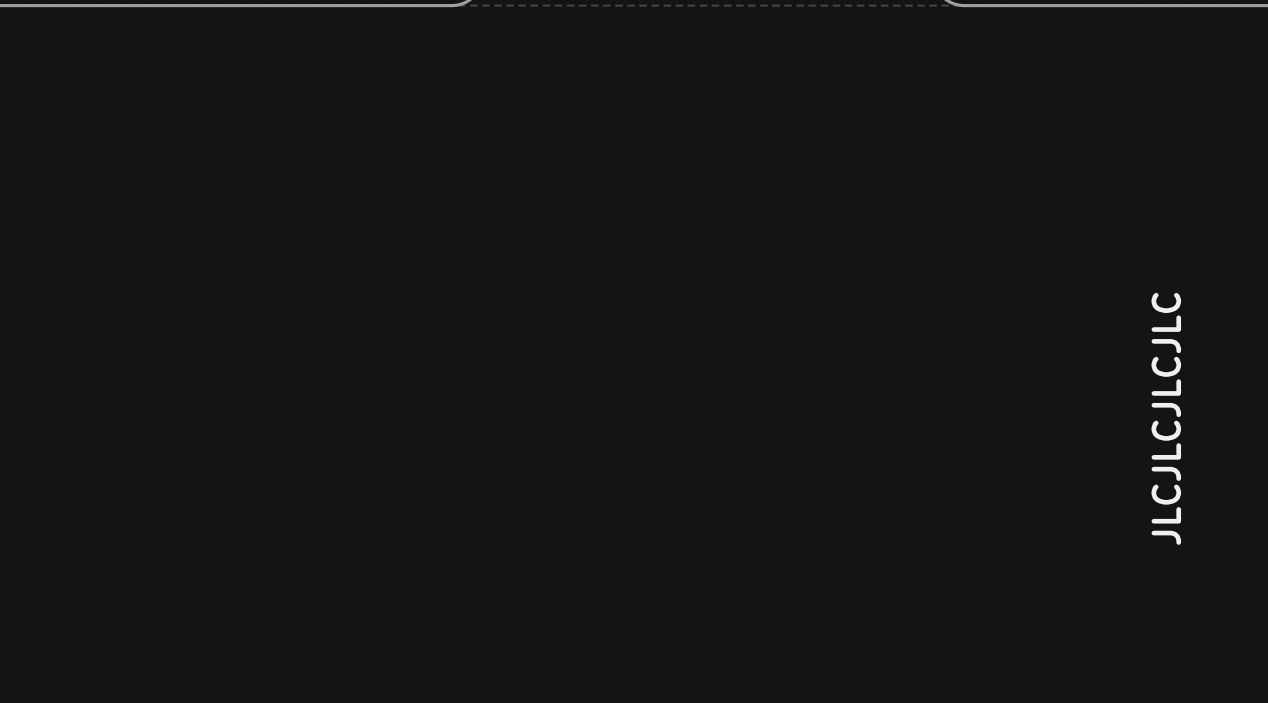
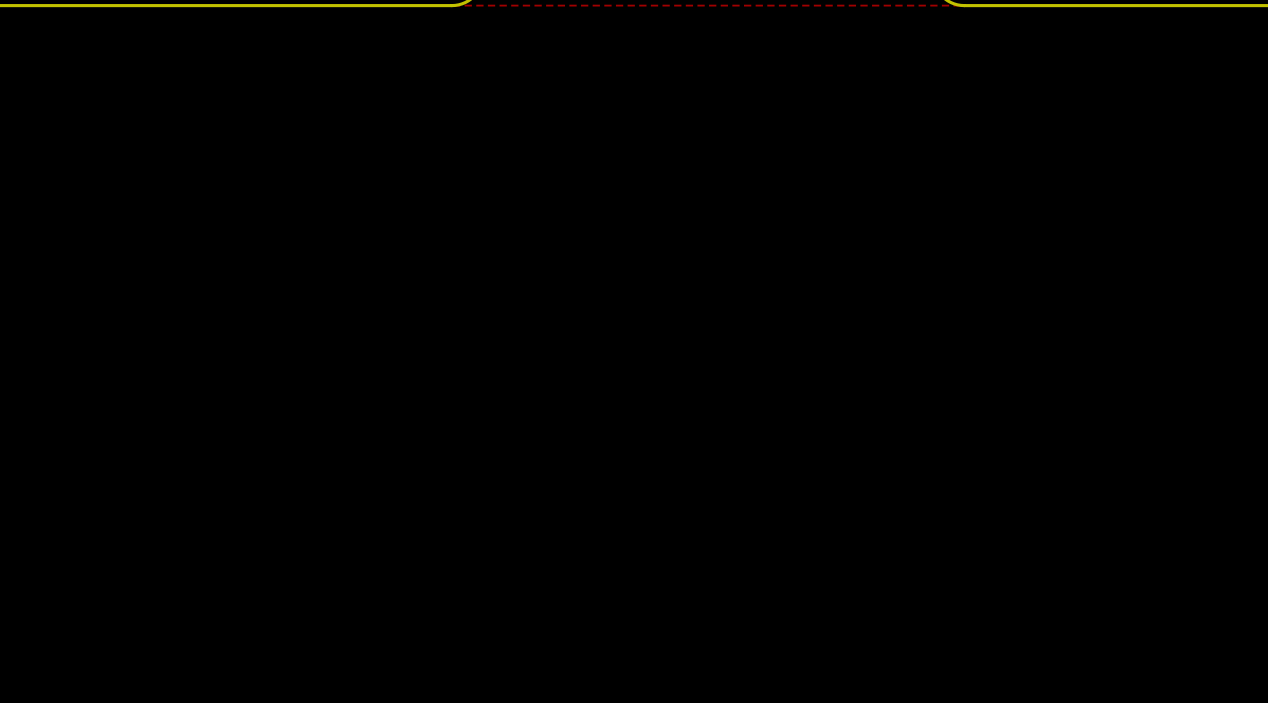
text: JLCJLCJLCJLC (1166, 418) -> none

